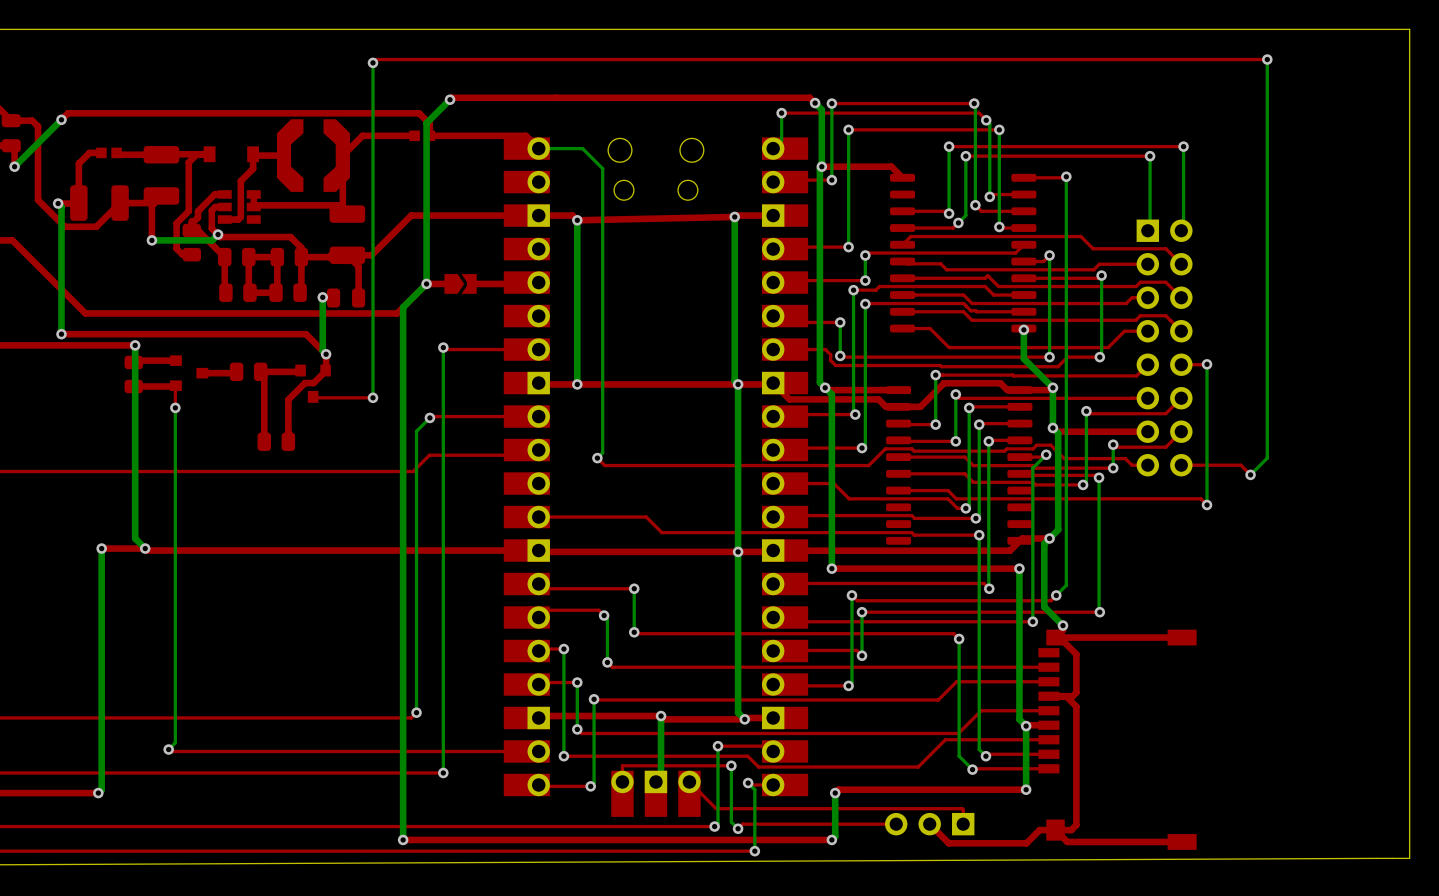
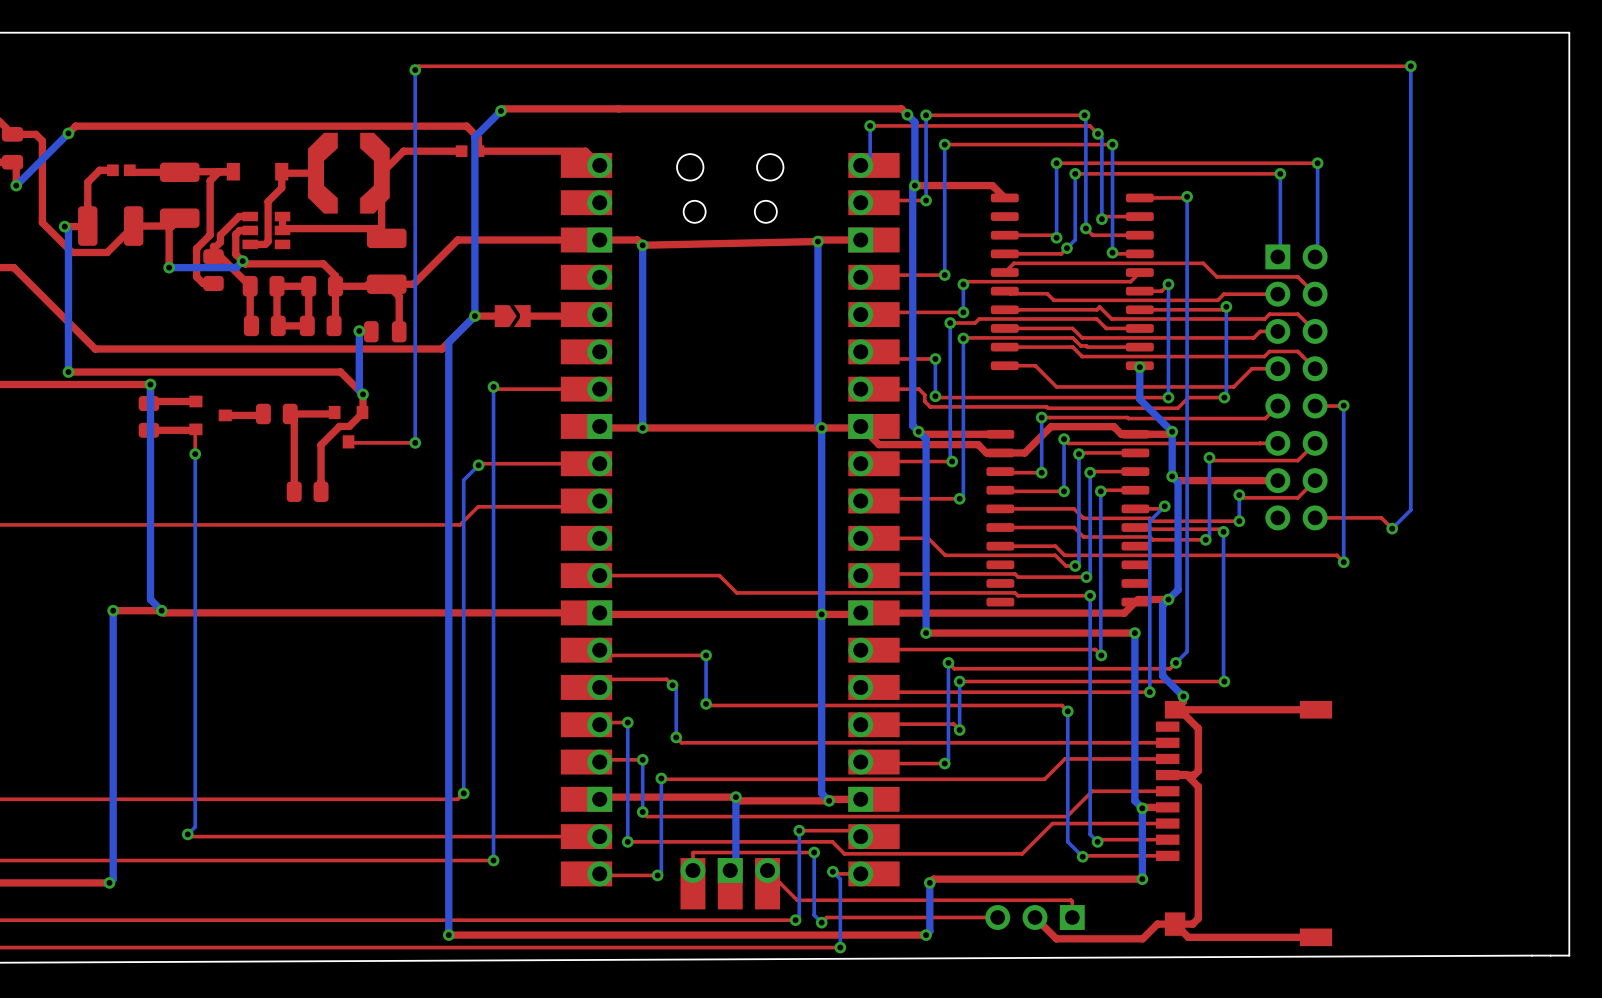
bottom track: (538, 148) (582, 148) (602, 168) (602, 452) (597, 458) -> none
top track: (597, 458) (604, 465) (868, 465) (885, 448) (911, 448) (914, 451) (1004, 451) (1006, 448) (1033, 448) (1036, 445) (1050, 445) (1064, 458) (1125, 458) (1131, 465) (1147, 465) -> none
via: (597, 458) -> none

